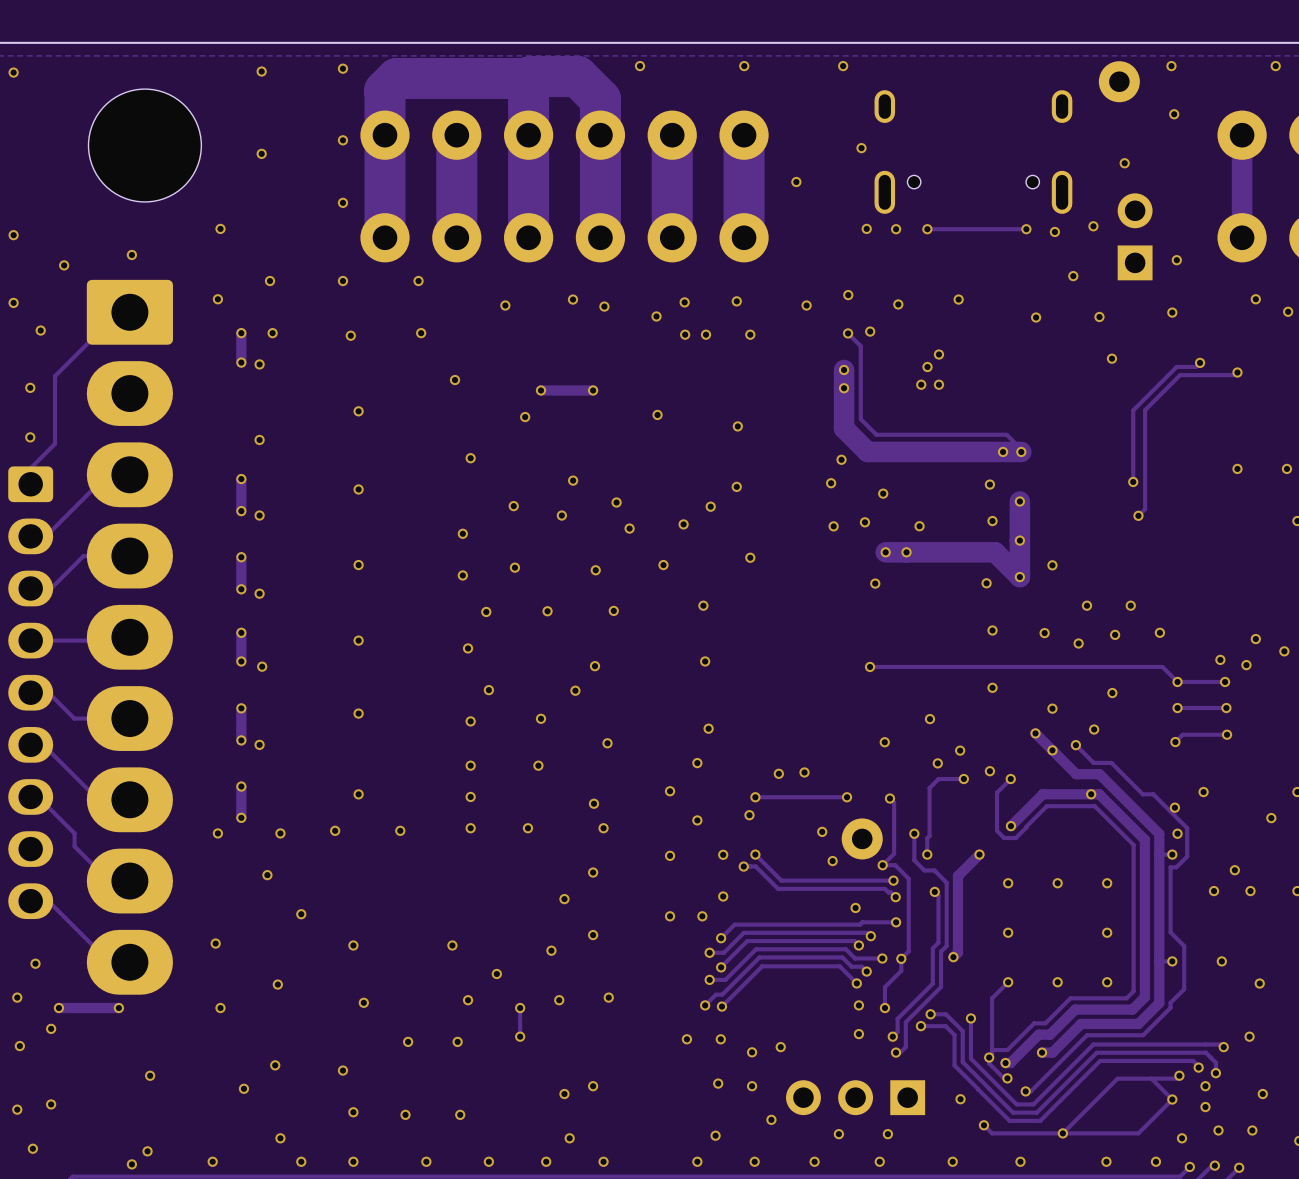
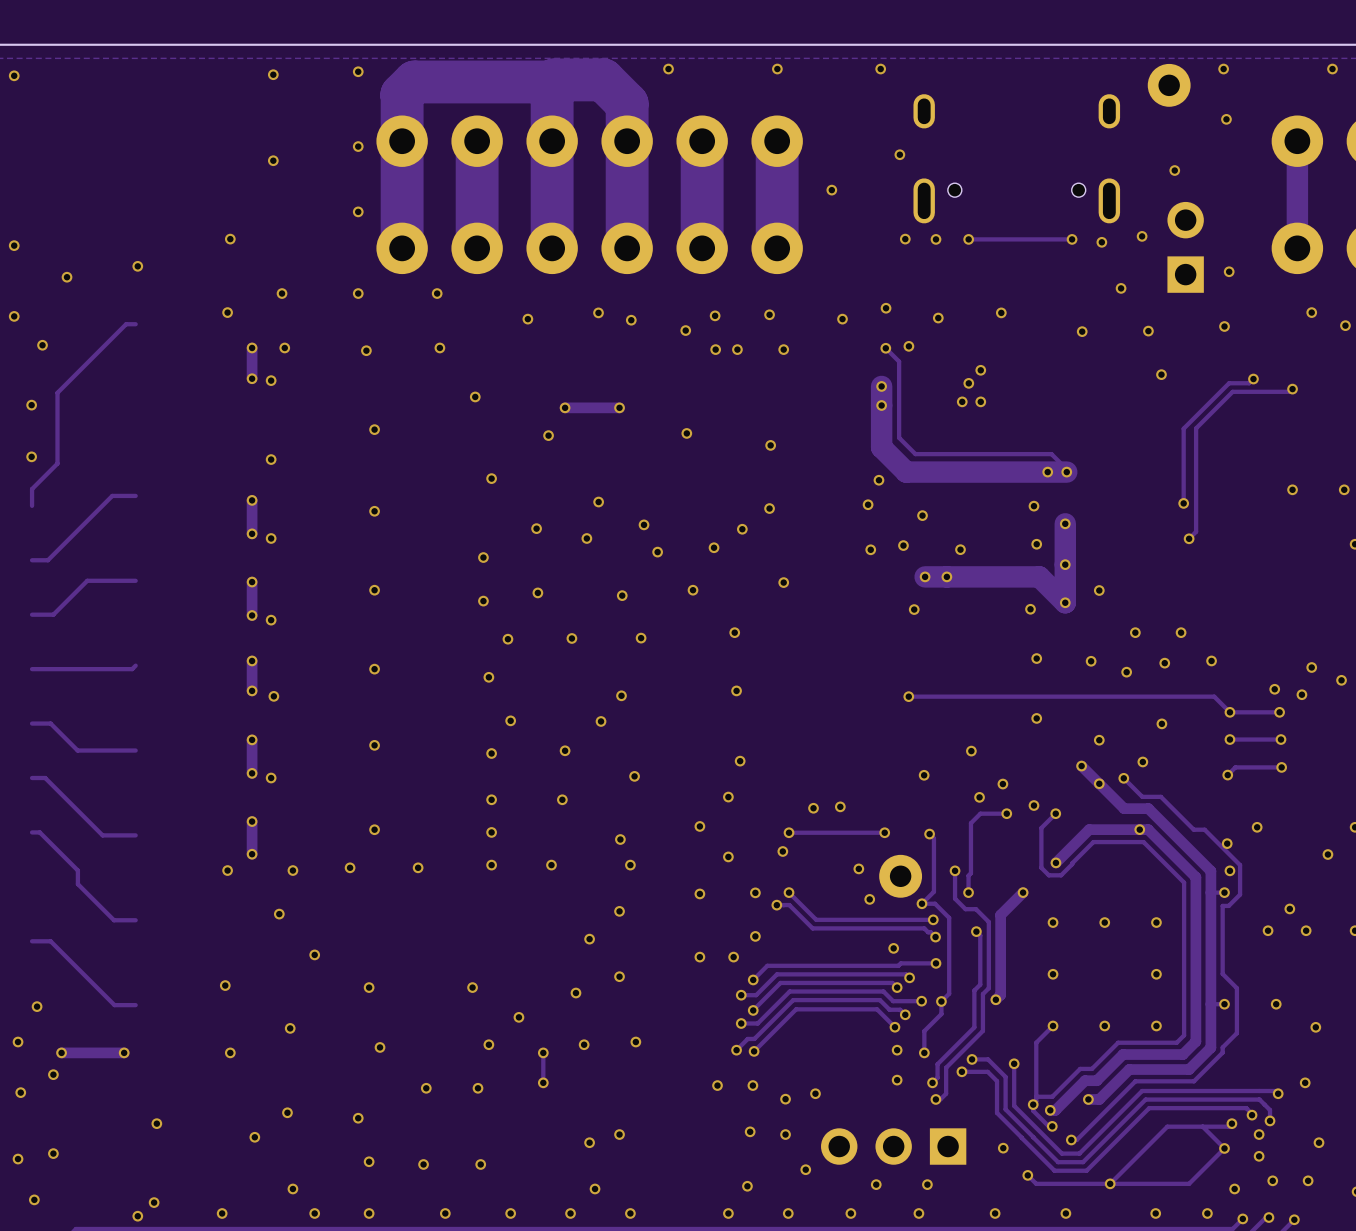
part: (144, 145) -> none
part: (129, 637) -> none
part: (30, 692) -> none

